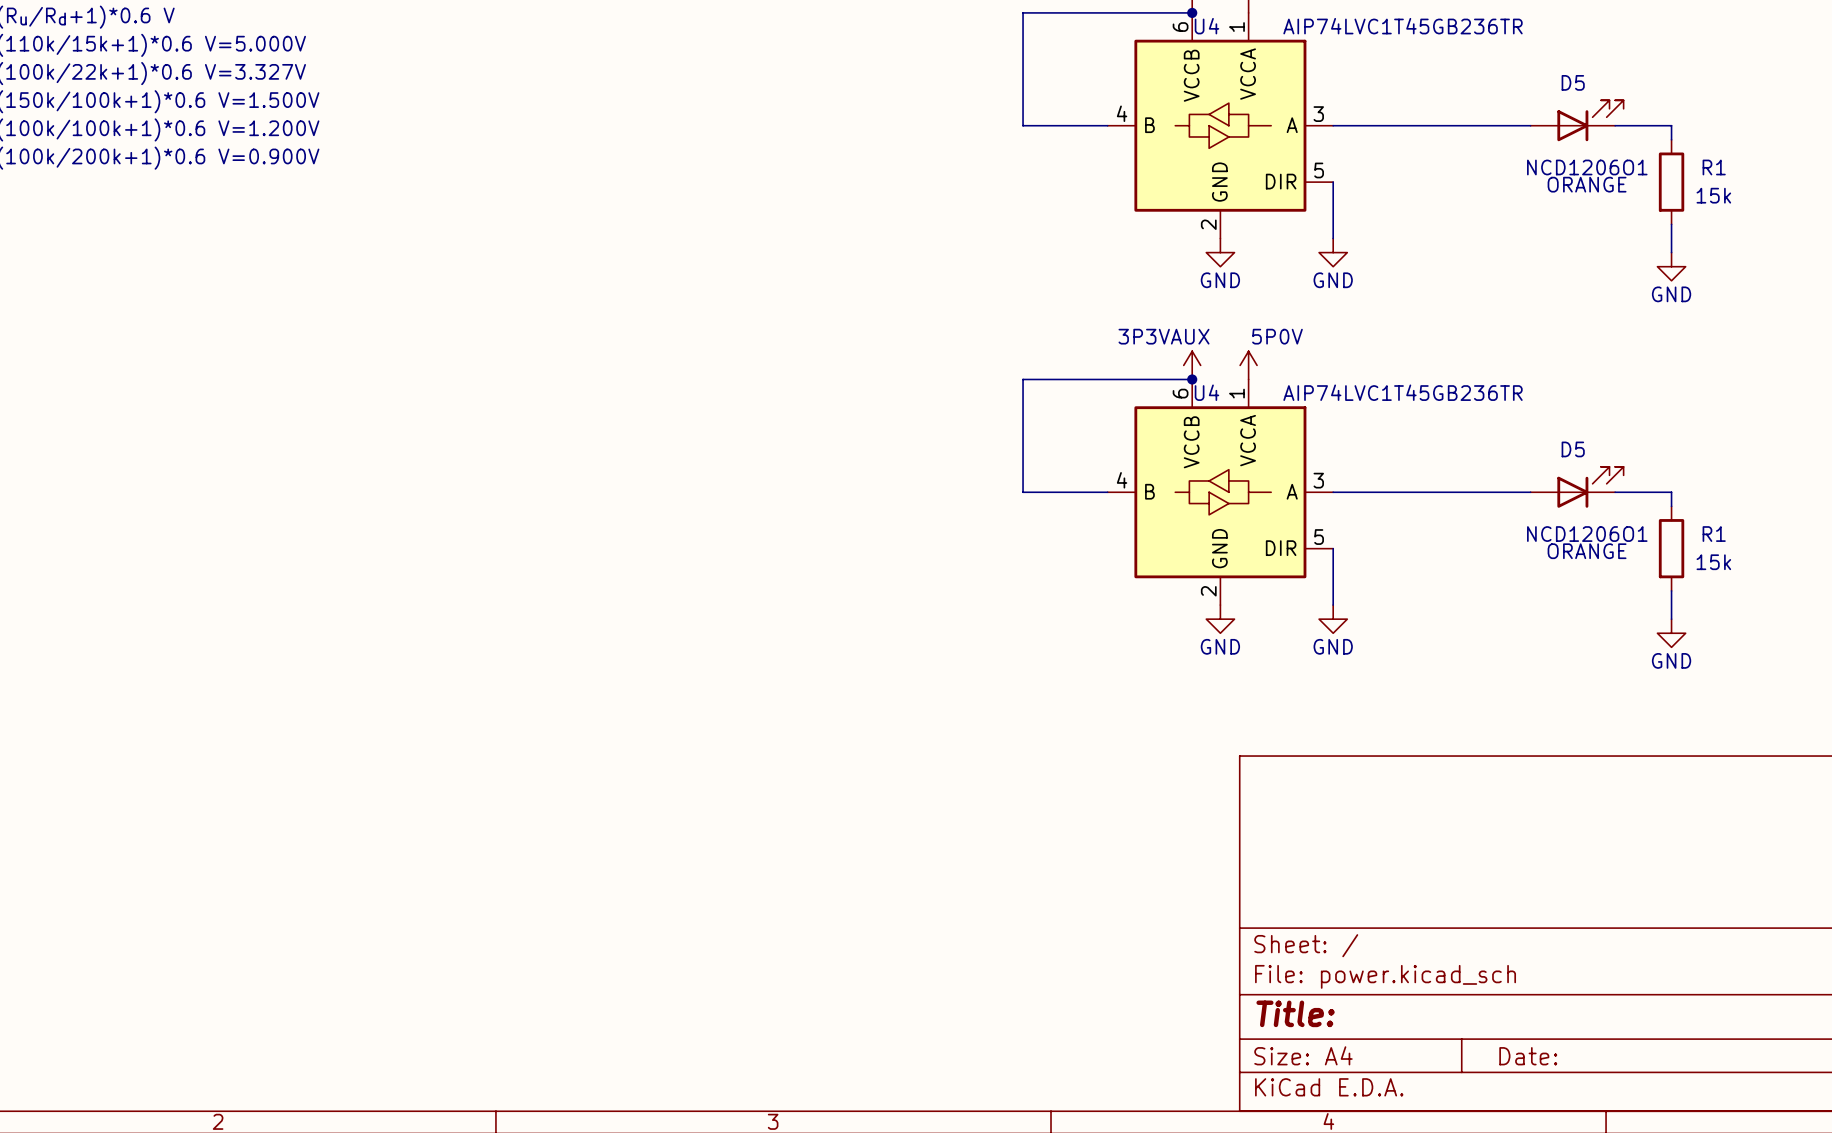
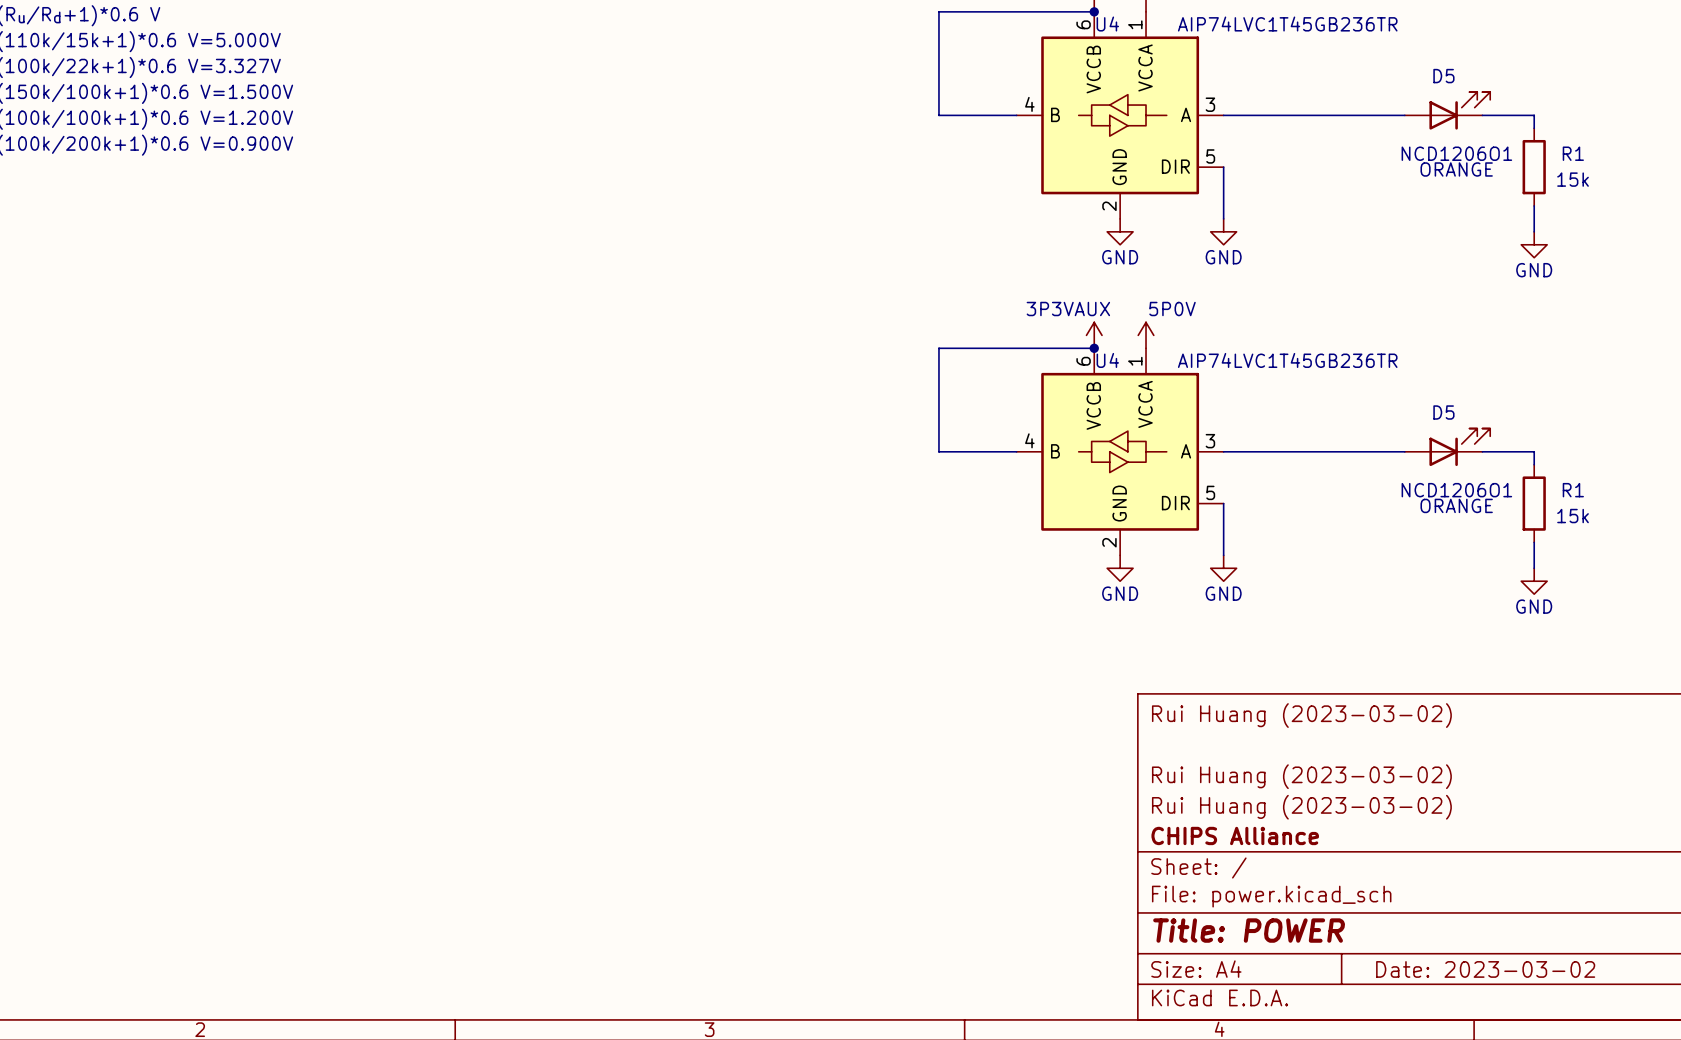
title block: none -> Rui Huang (2023-03-02) (1301, 715)
title block: none -> Rui Huang (2023-03-02) (1301, 776)
title block: none -> Rui Huang (2023-03-02) (1301, 807)
title block: none -> CHIPS Alliance (1235, 835)
title block: Title: (1295, 1013) -> Title: POWER (1249, 930)
title block: Date: (1528, 1056) -> Date: 2023-03-02 (1485, 969)

